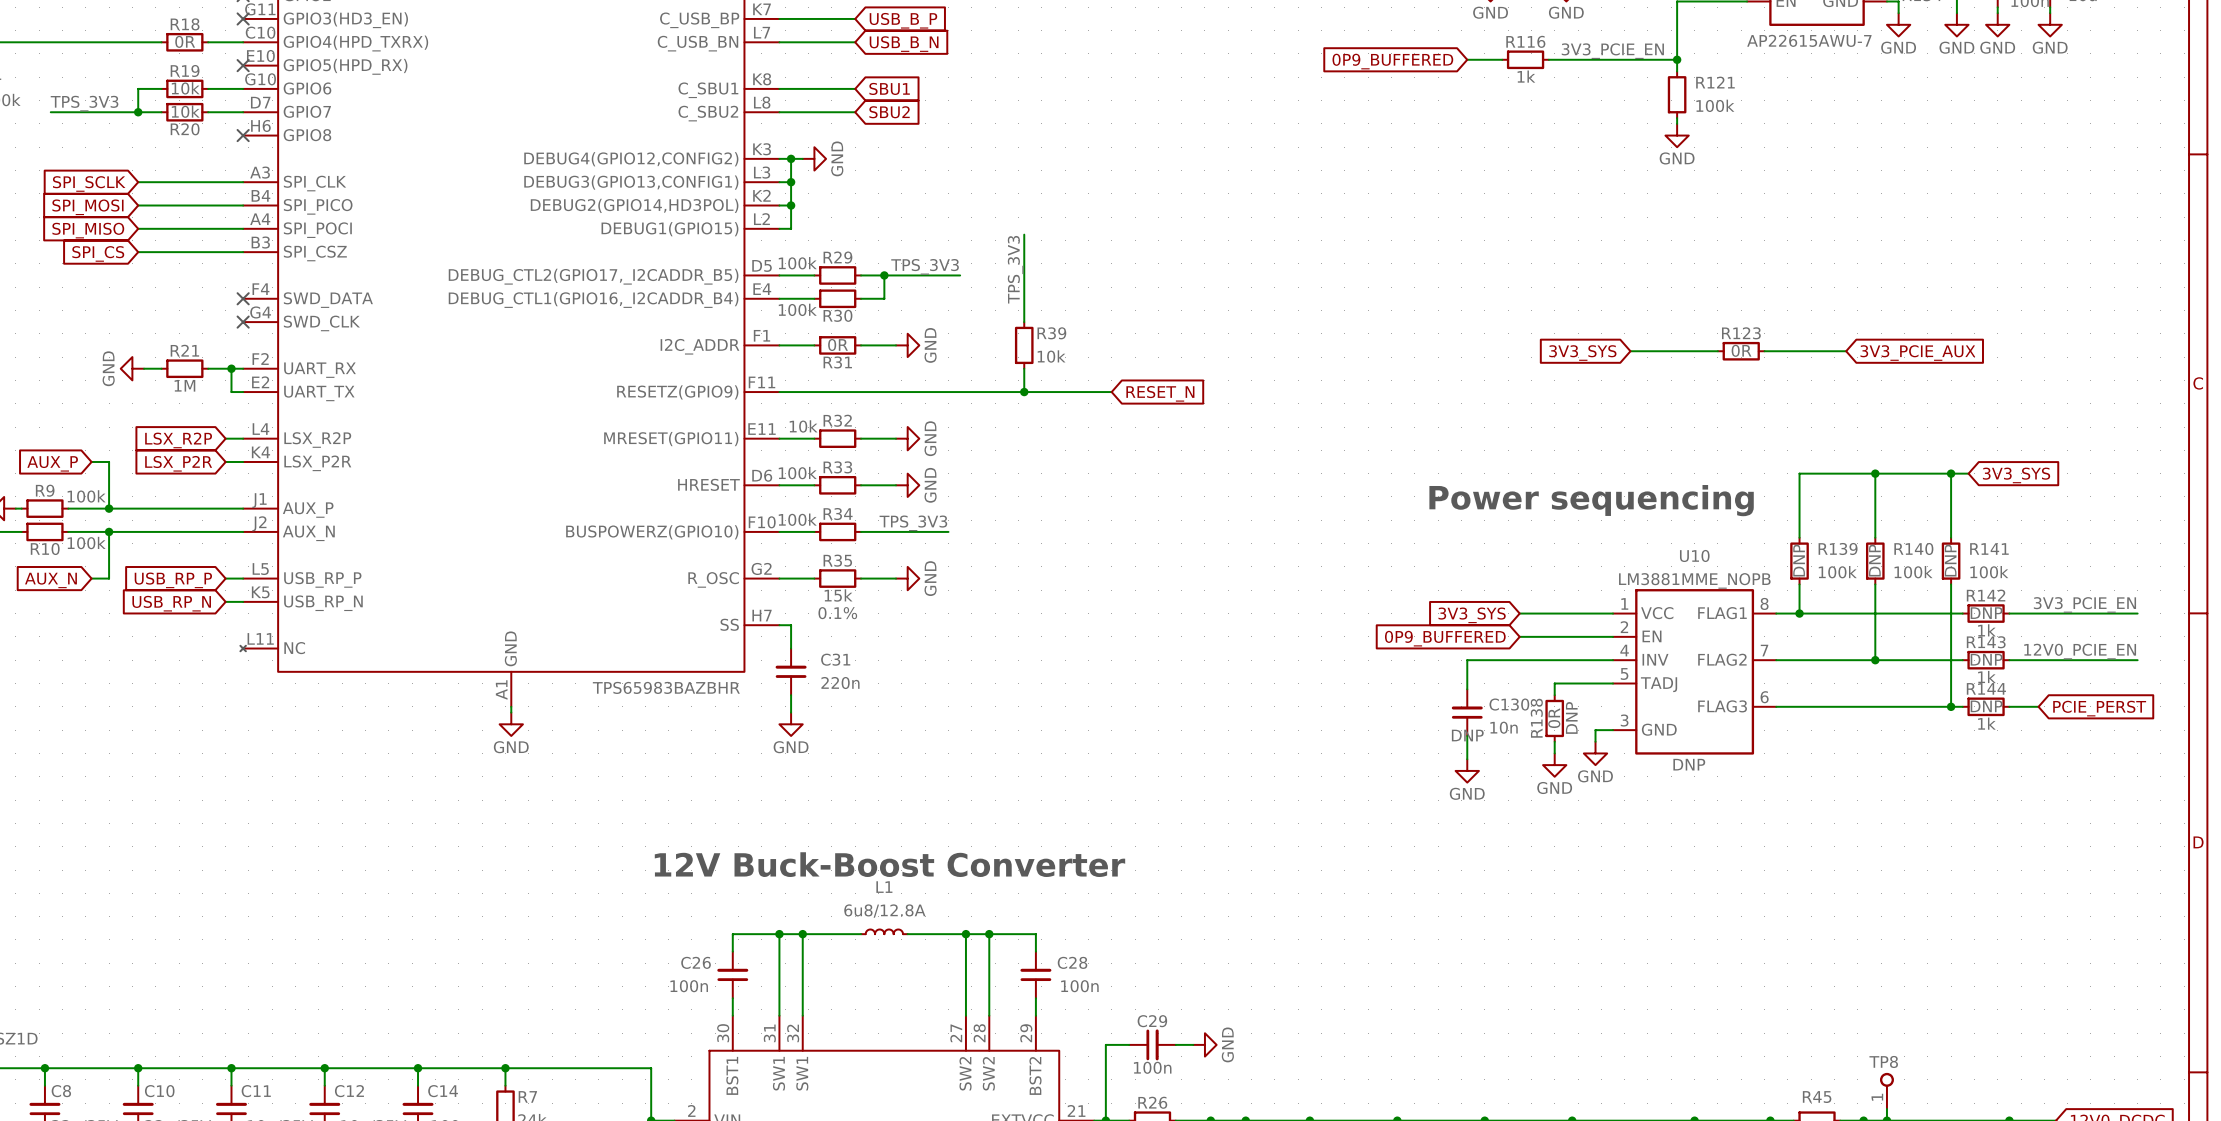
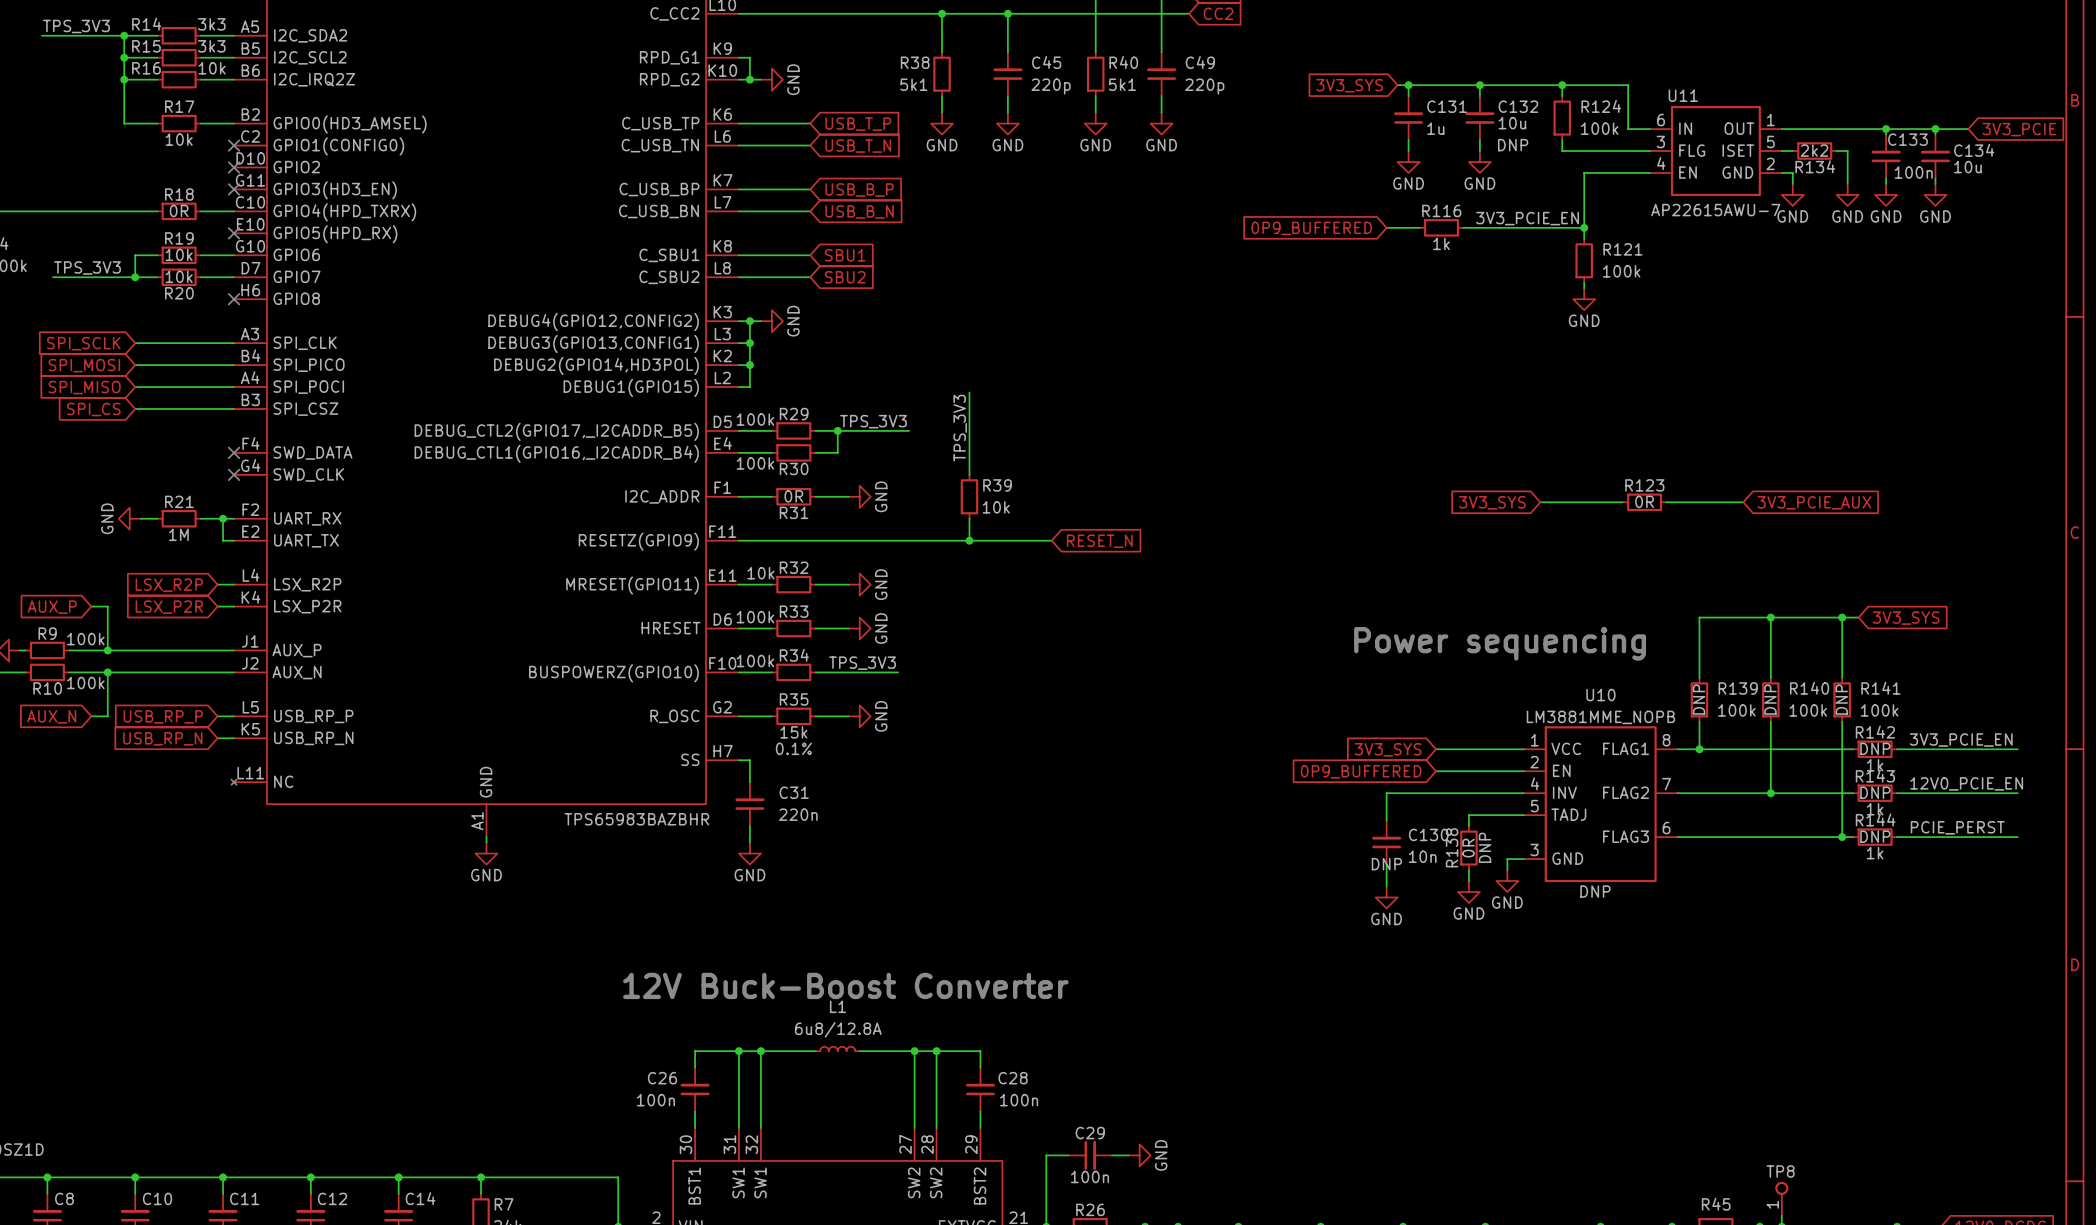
label position: 3V3_PCIE_EN (2084, 604) -> 3V3_PCIE_EN (1961, 740)
label position: 12V0_PCIE_EN (2080, 651) -> 12V0_PCIE_EN (1966, 783)
label: none -> PCIE_PERST (1957, 827)
wire: none -> (1924, 837) (2017, 837)
global label: PCIE_PERST (2099, 708) -> none

